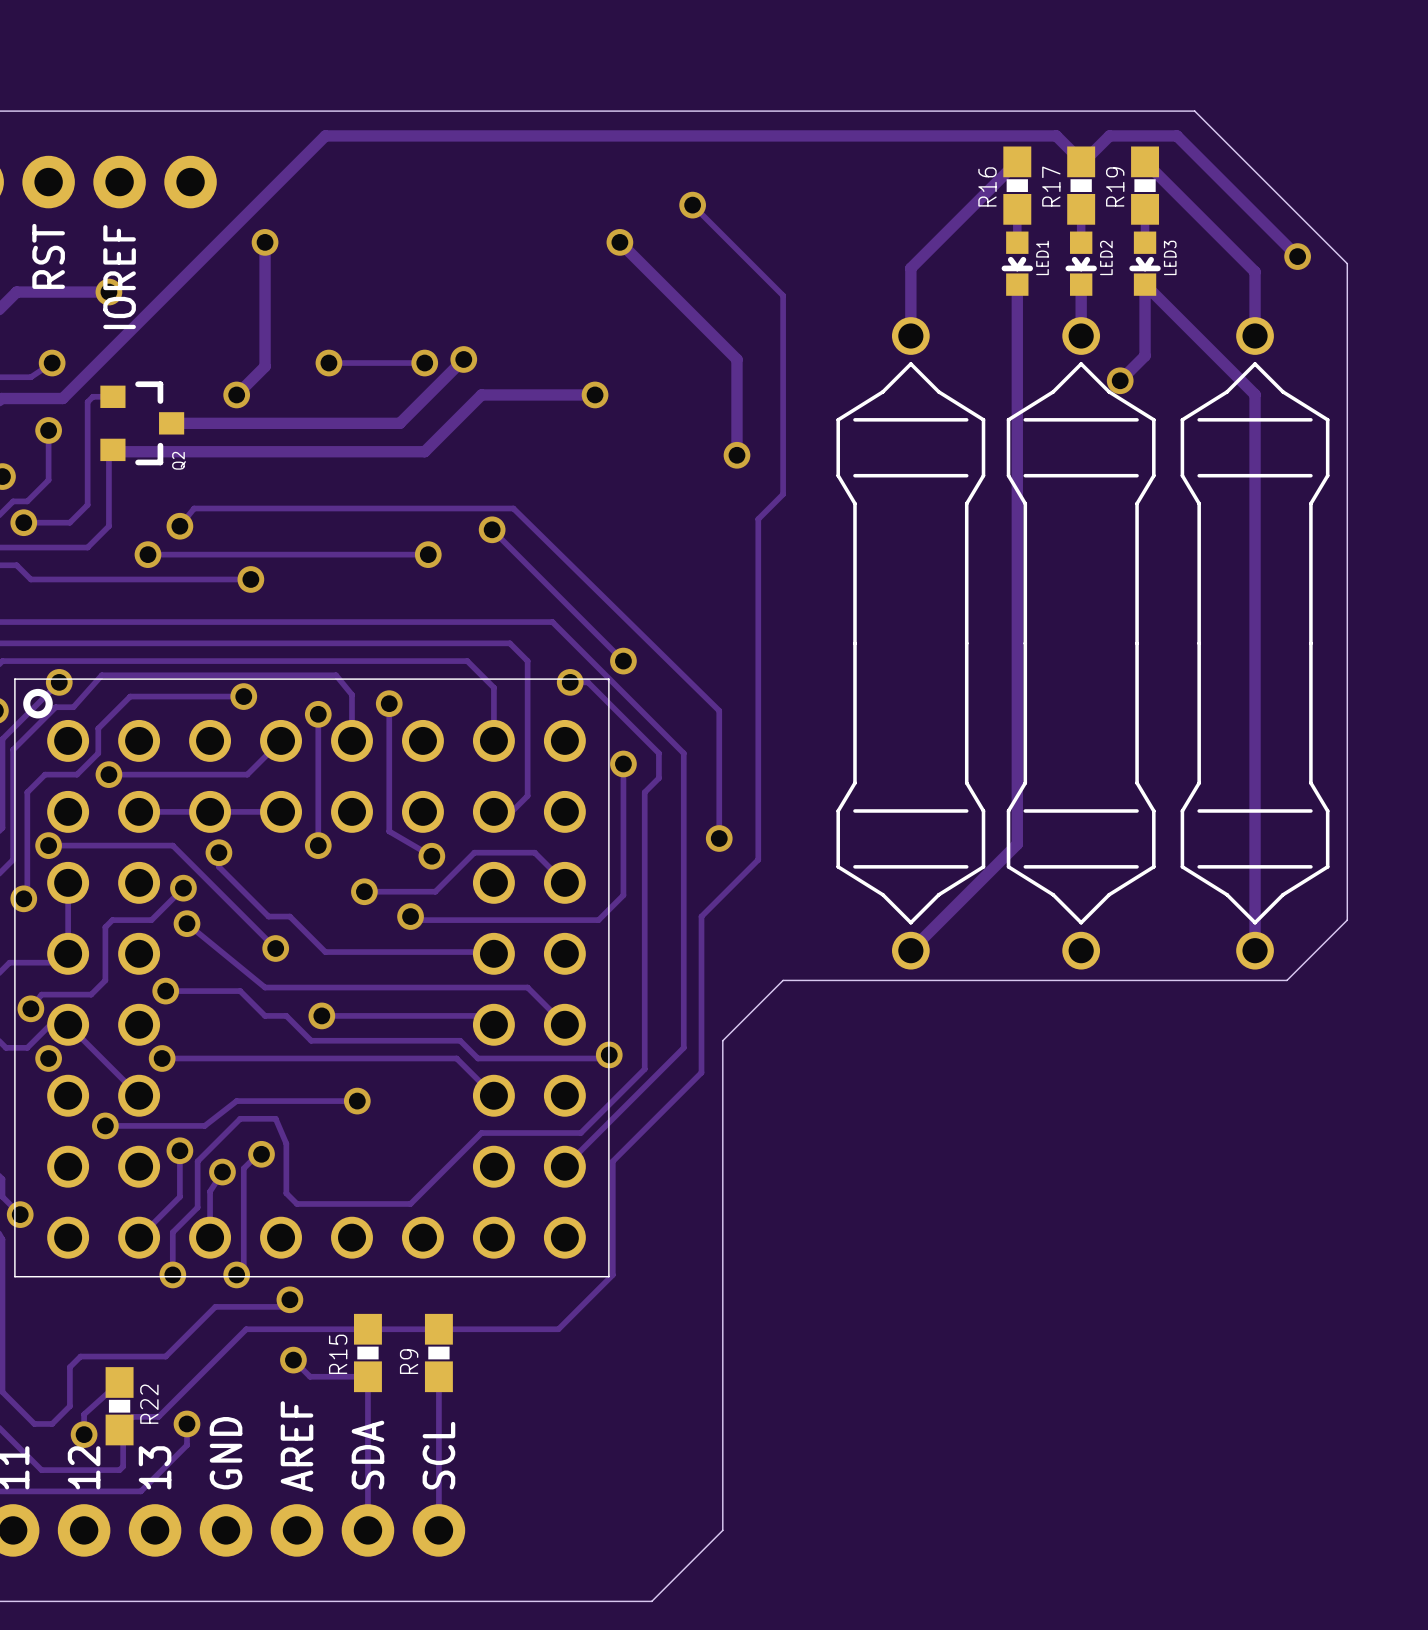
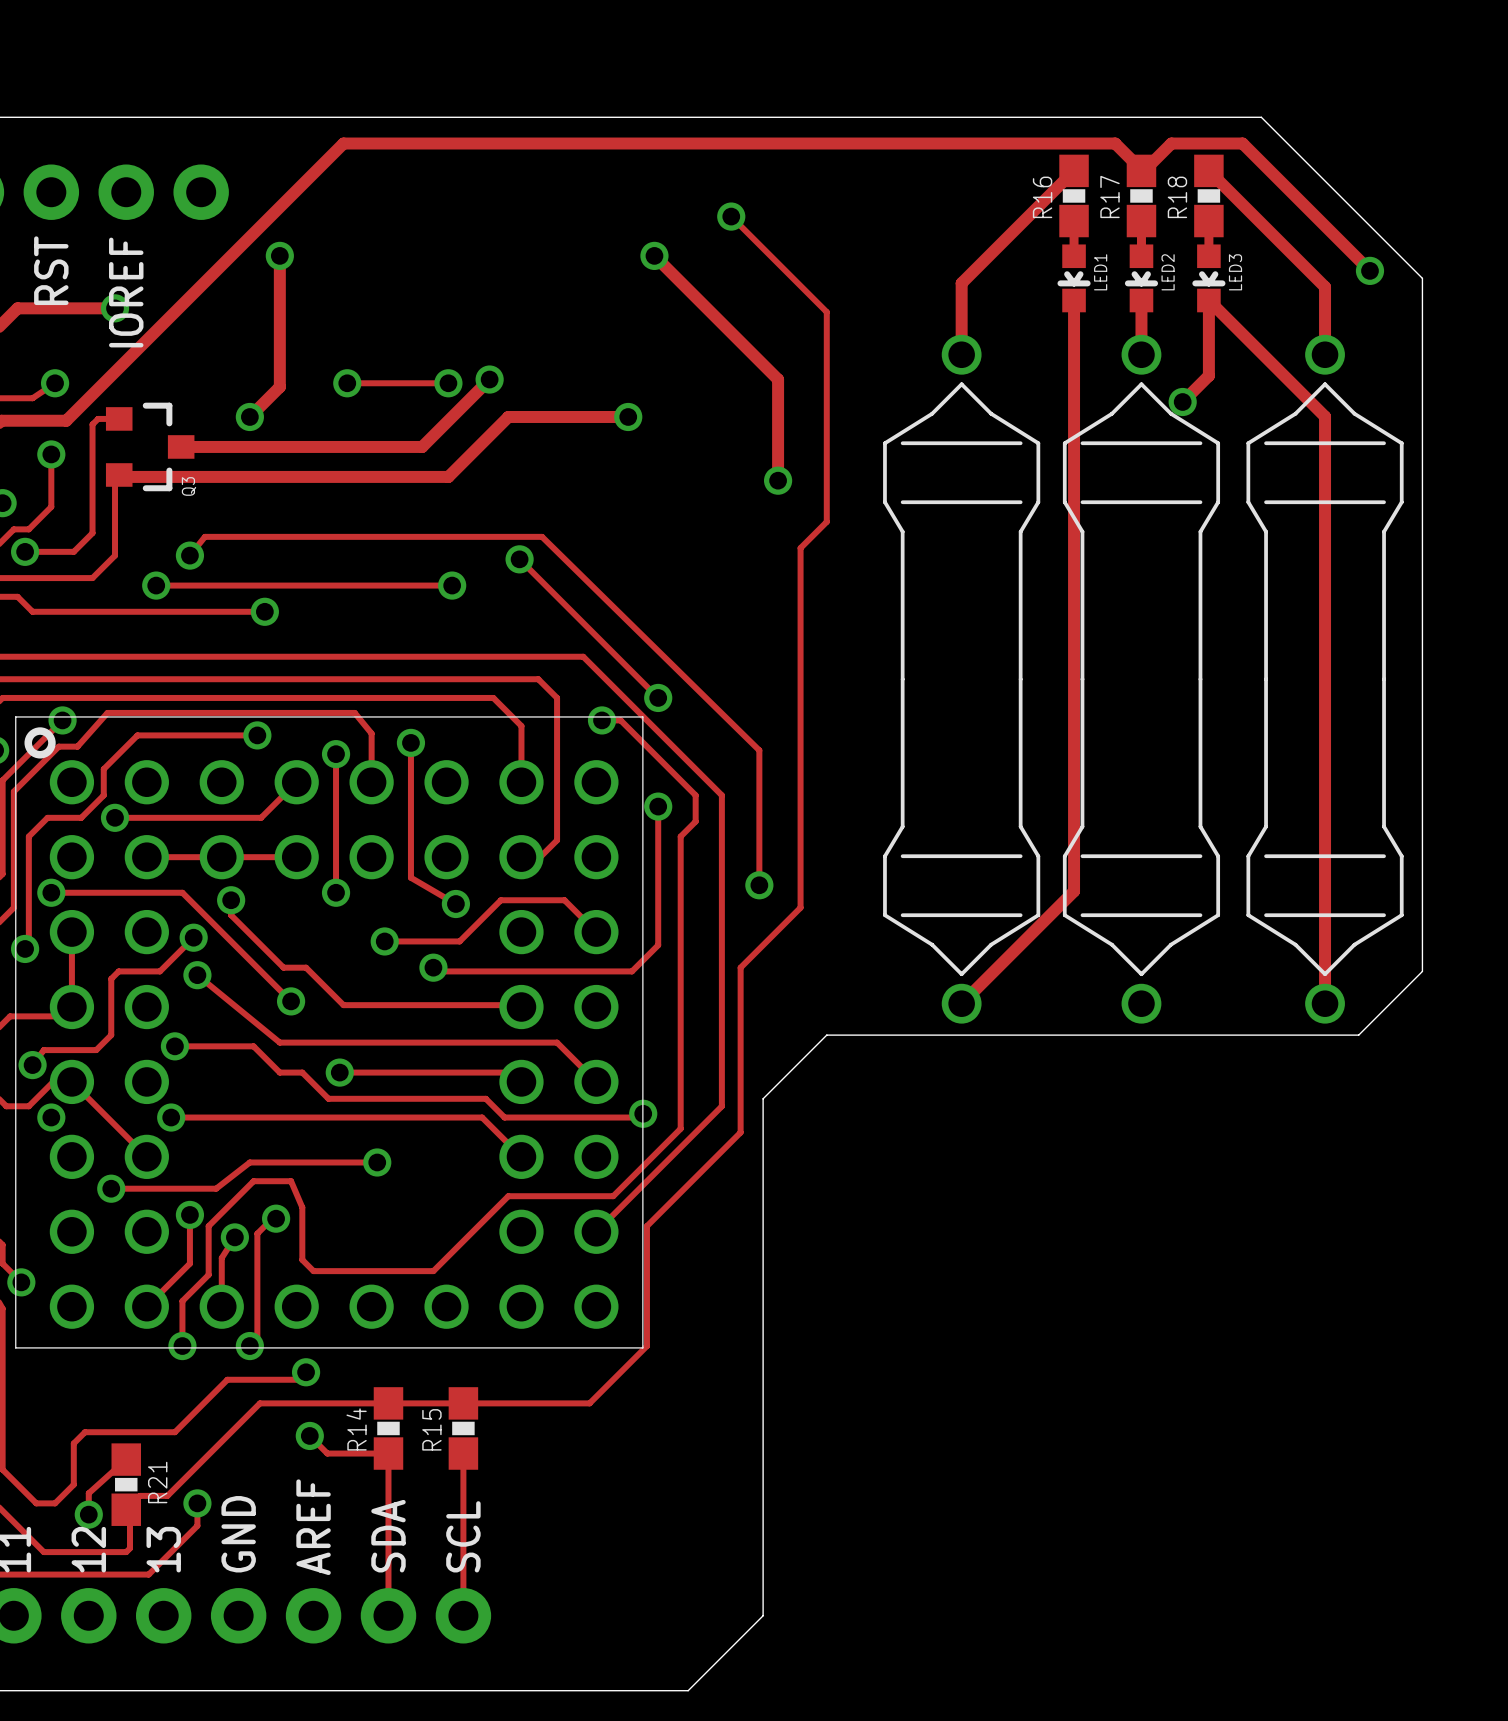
R19 name: R19 (1115, 186) -> R18 (1177, 197)
Q2 name: Q2 (179, 460) -> Q3 (189, 486)
R15 name: R15 (338, 1354) -> R14 (356, 1429)
R9 name: R9 (409, 1361) -> R15 (431, 1429)
R22 name: R22 (149, 1404) -> R21 (157, 1482)

